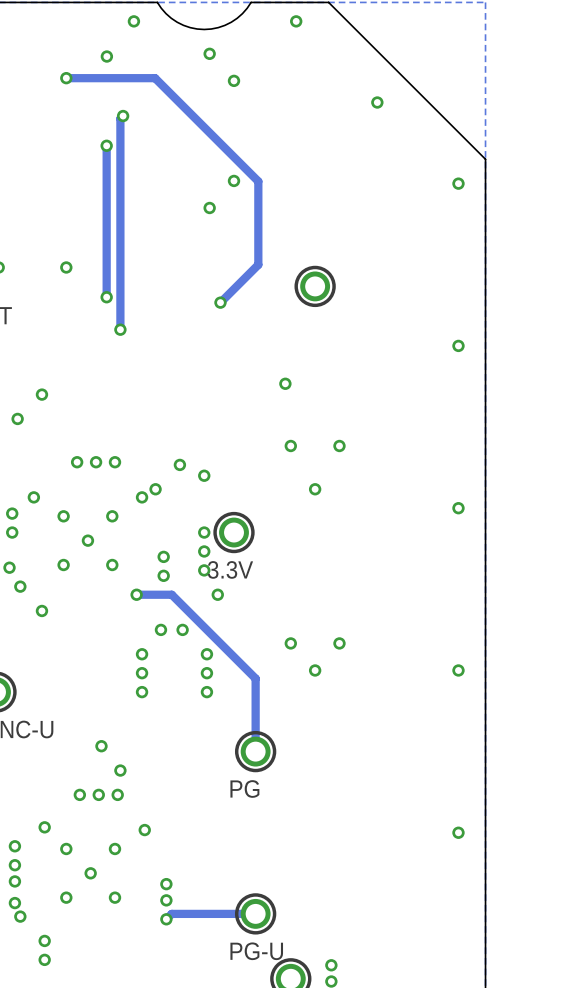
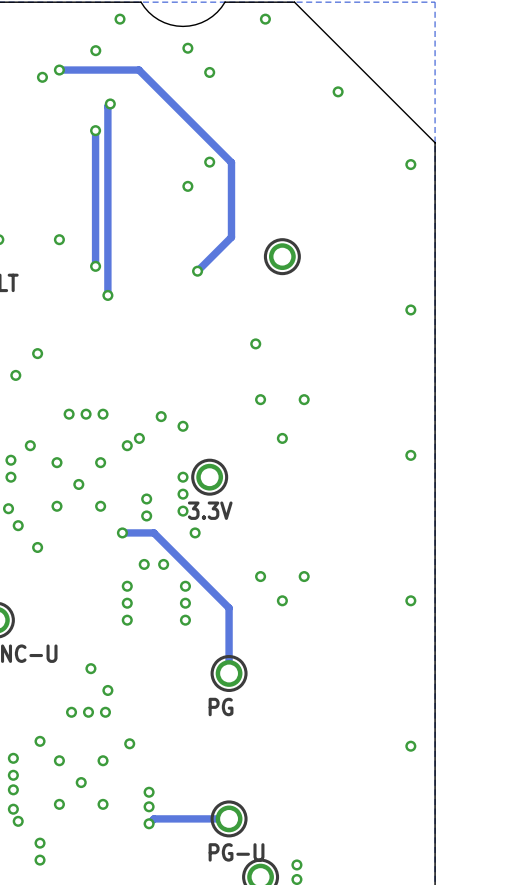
via: none -> (42, 77)

